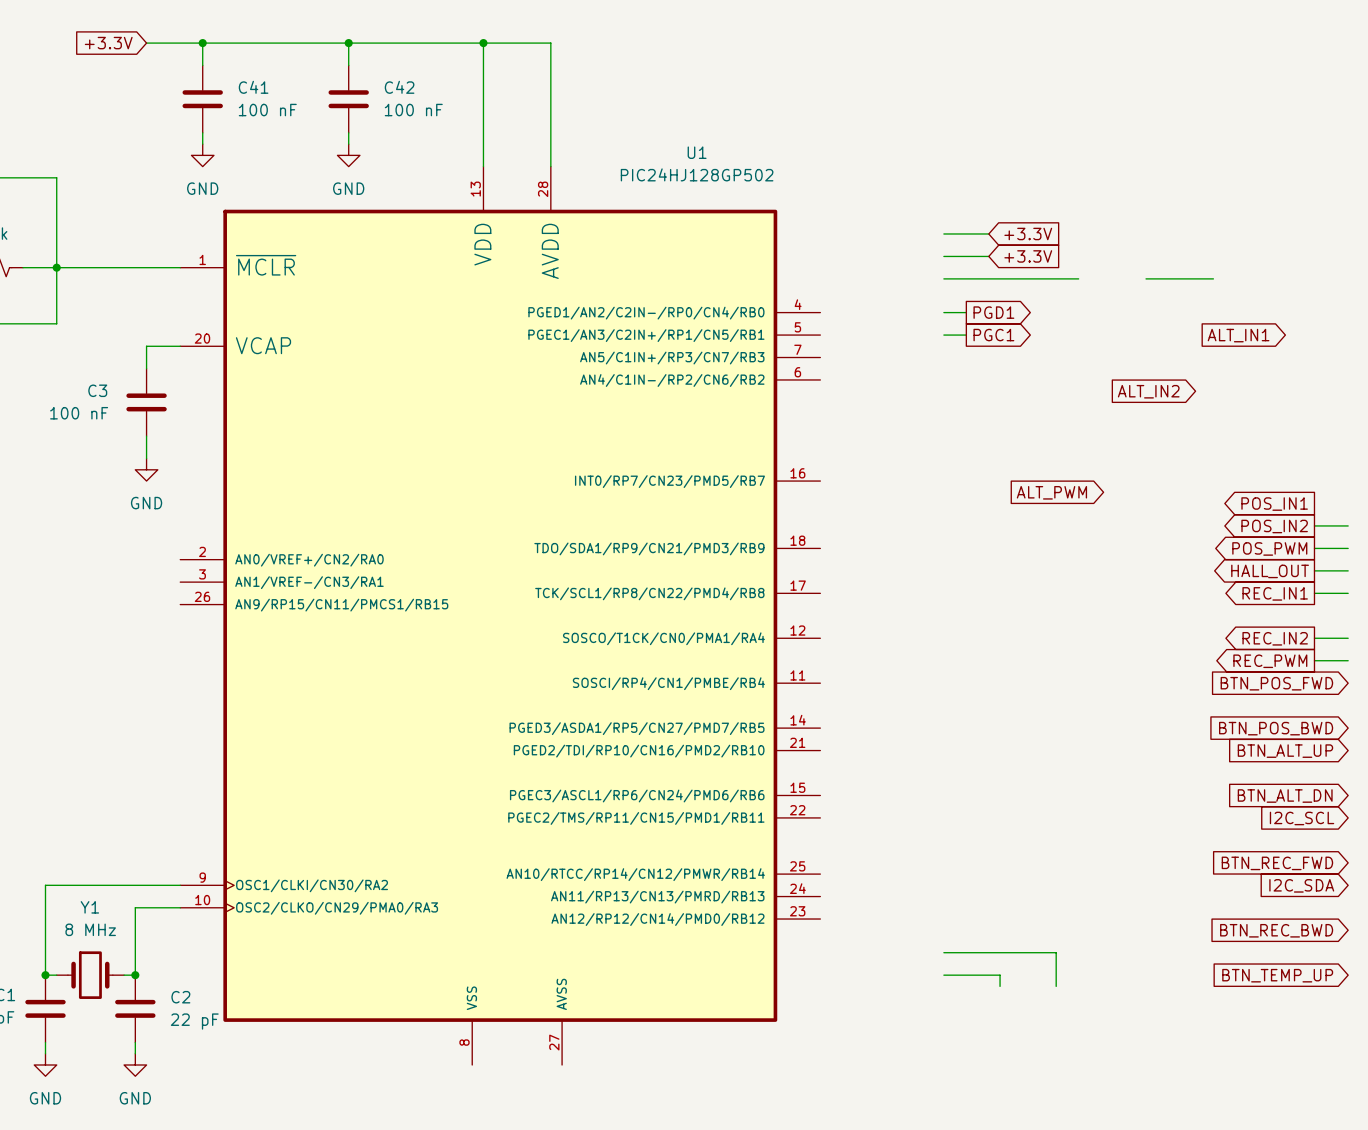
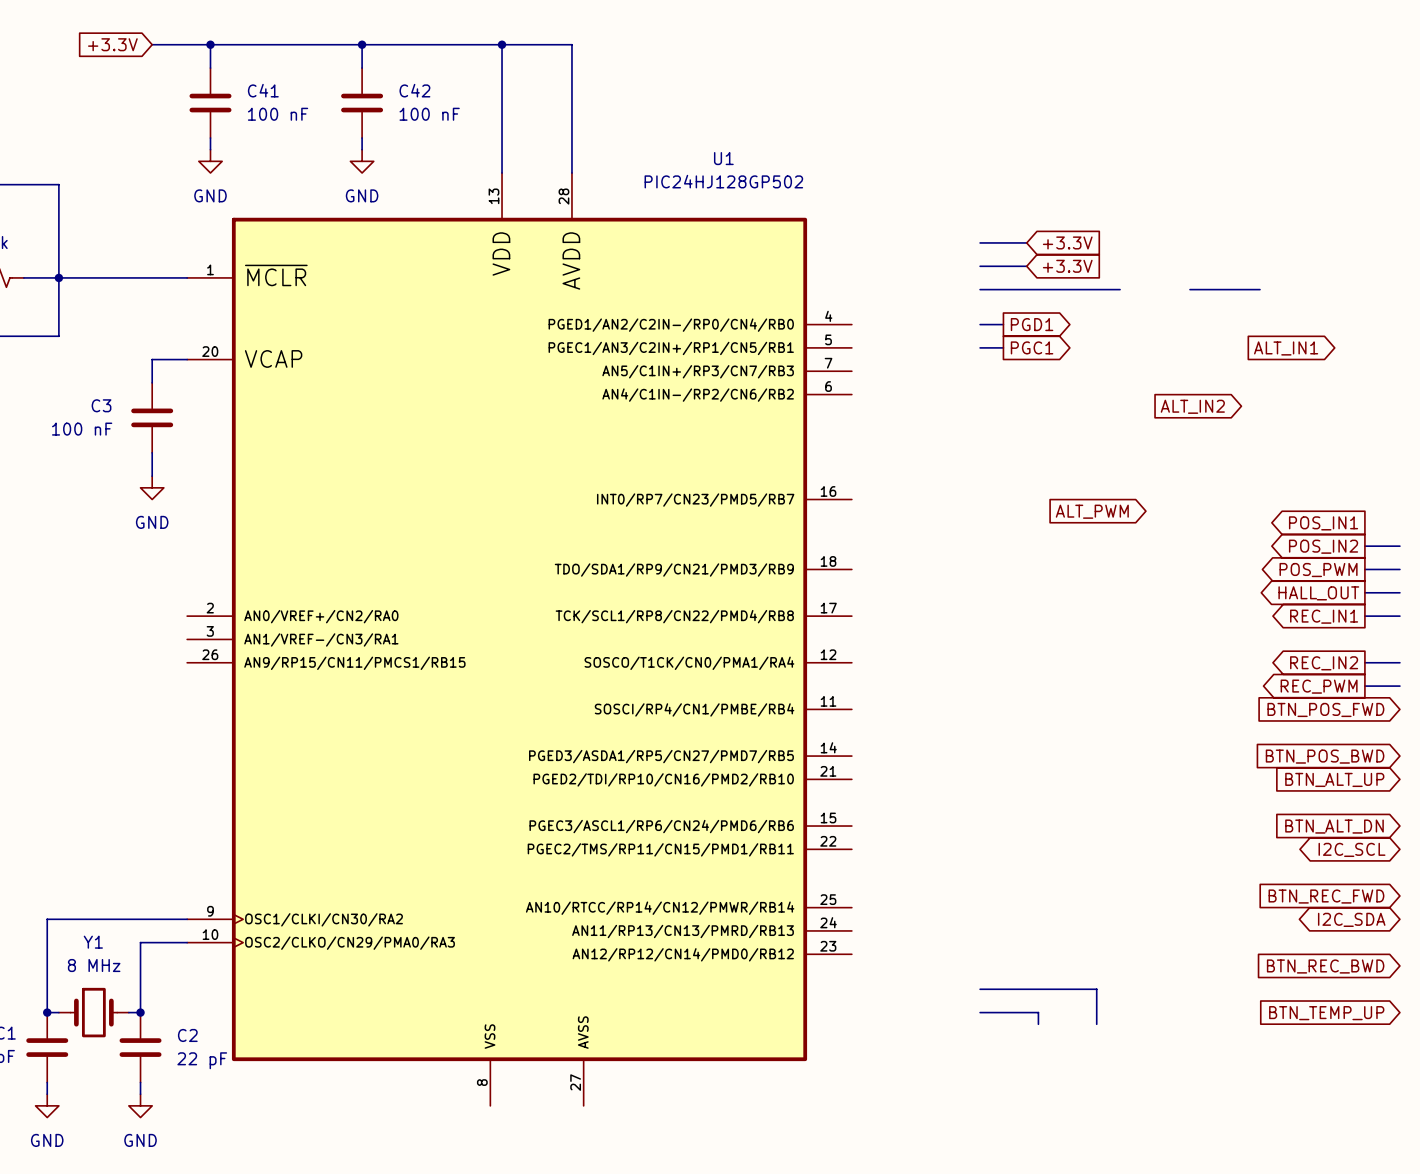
U1 symbol: [180, 166, 821, 1066] -> [187, 173, 852, 1106]
global label shape: input (1302, 818) -> bidirectional (1352, 849)
global label shape: input (1301, 885) -> bidirectional (1351, 919)

